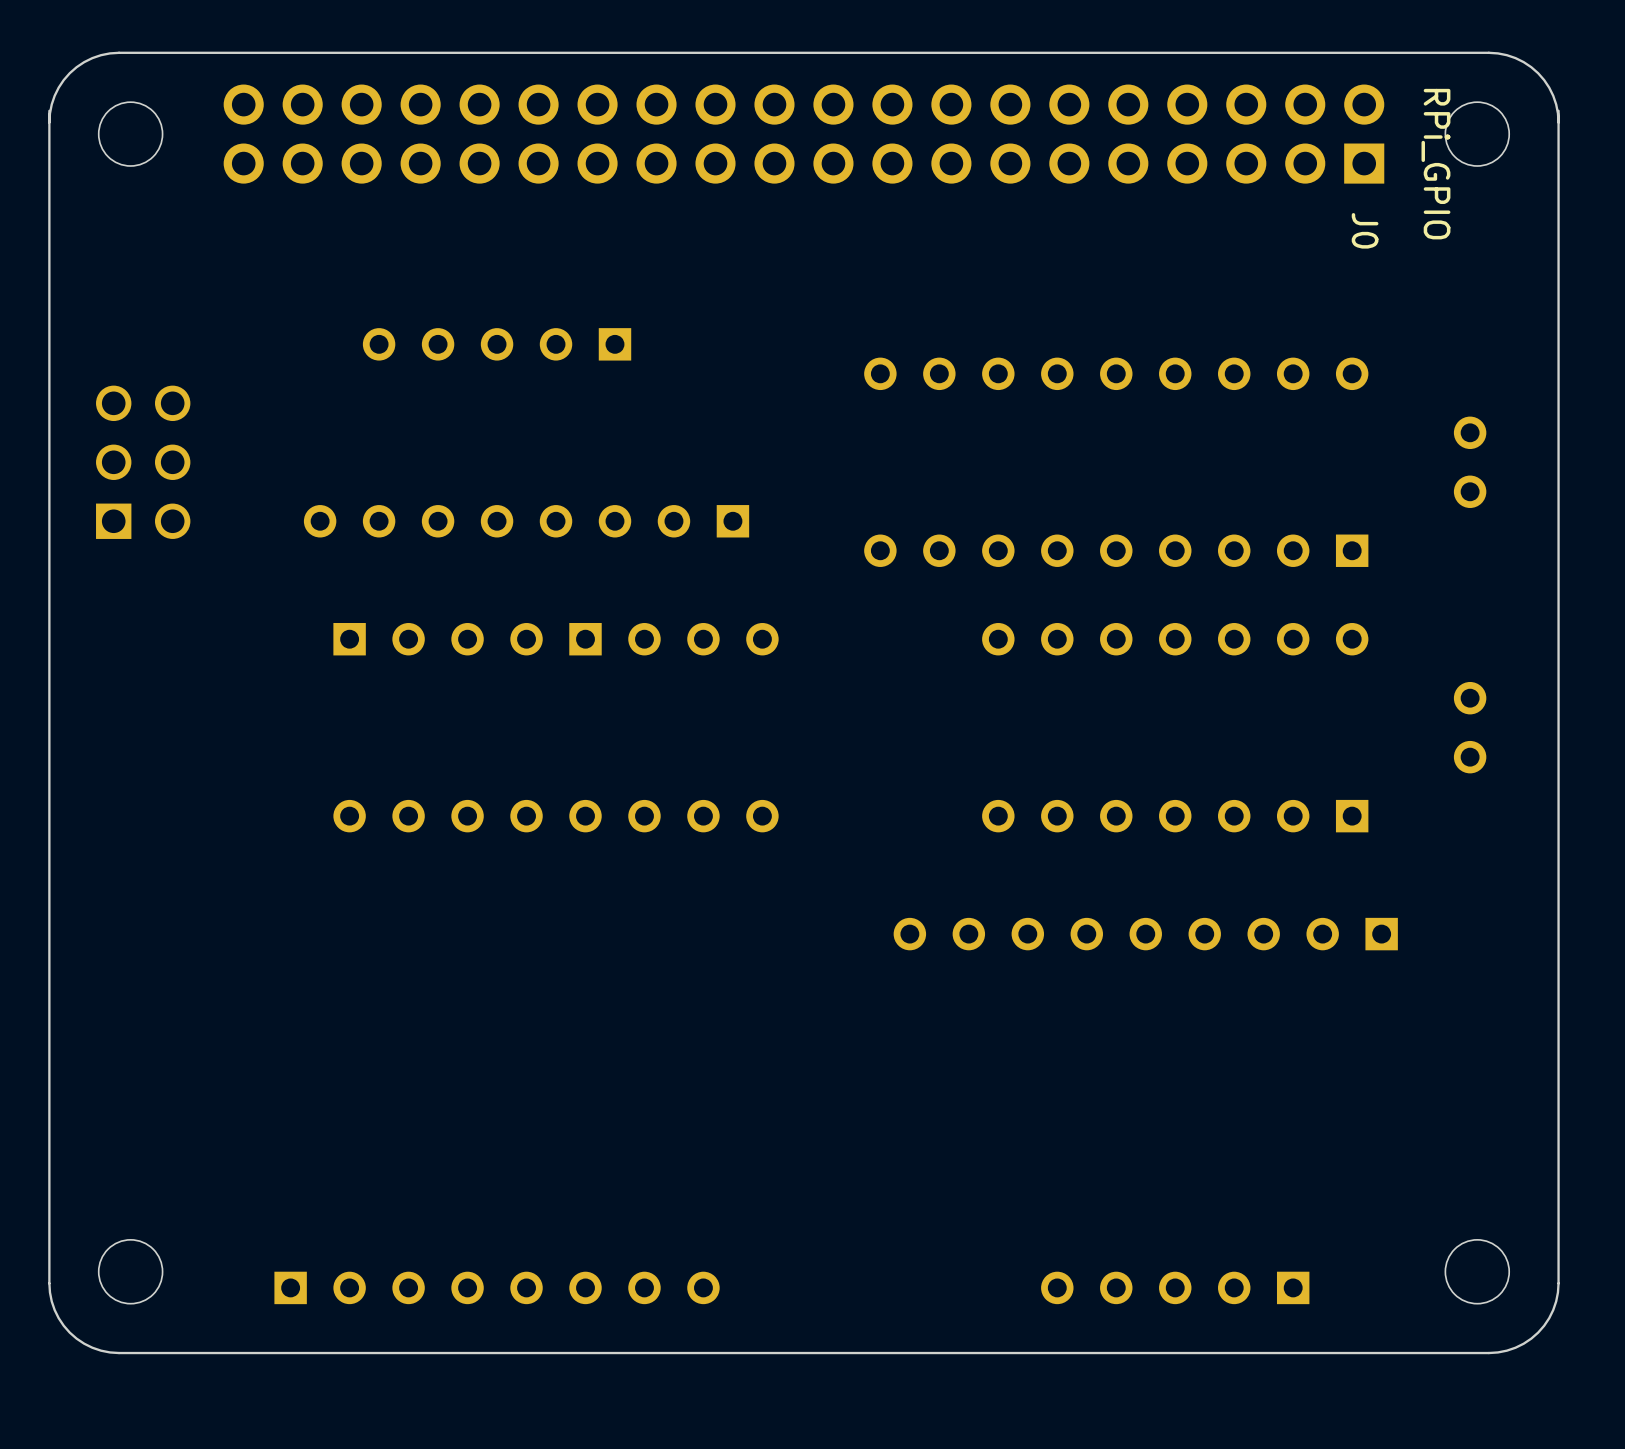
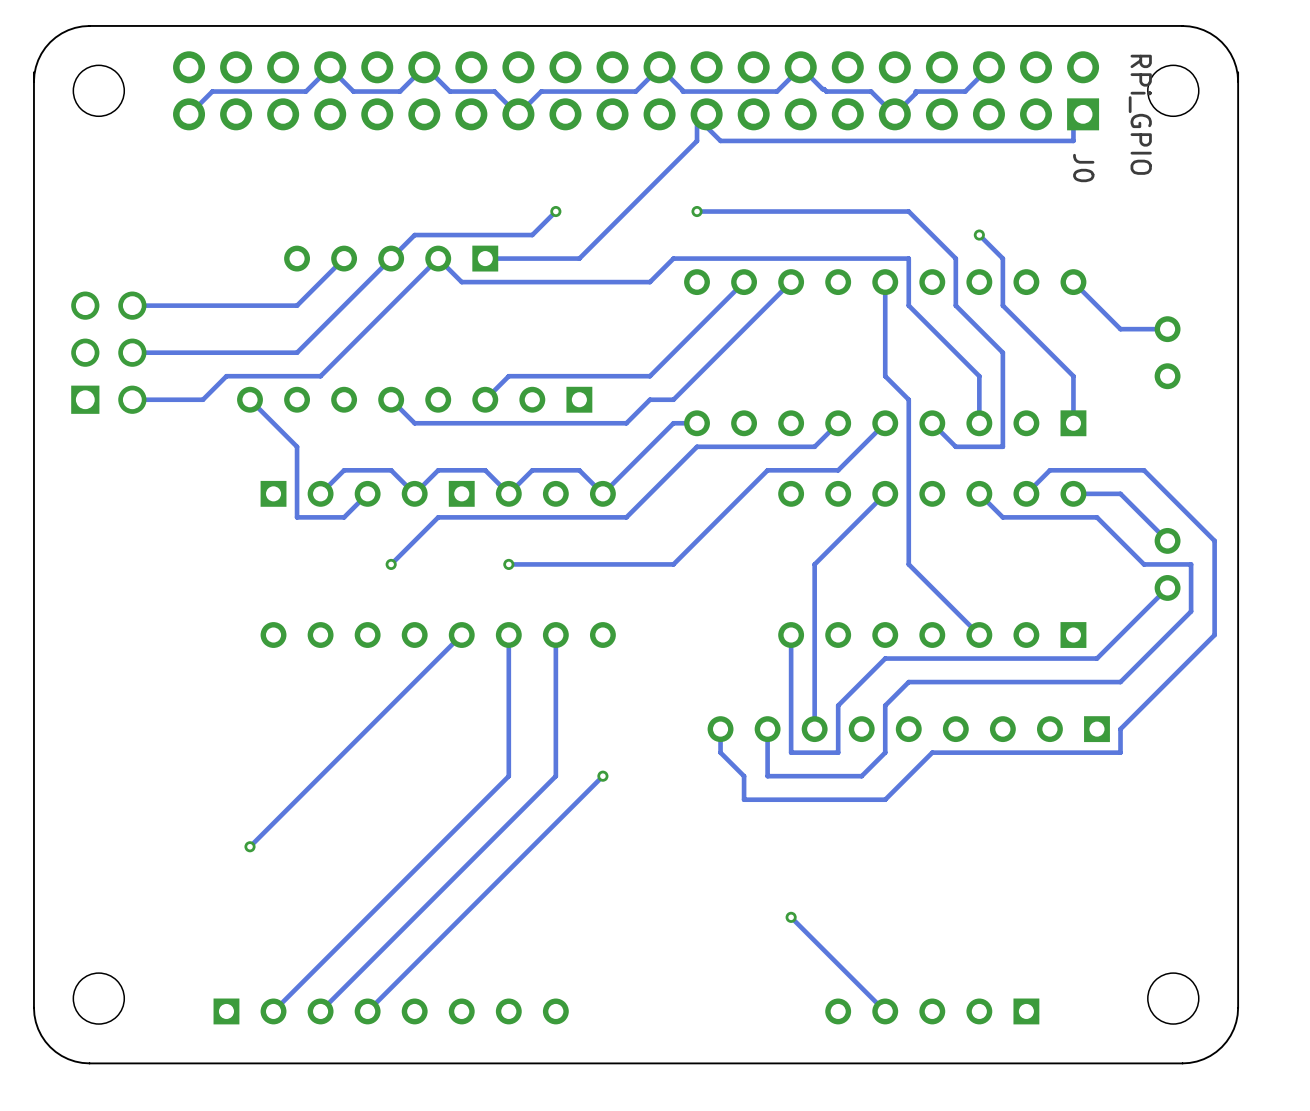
track: none -> (988, 67) (965, 91) (915, 91) (894, 114) (871, 91) (826, 91) (800, 67) (777, 91) (682, 91) (659, 67) (635, 91) (541, 91) (518, 114) (494, 91) (449, 91) (425, 67) (400, 91) (353, 91) (330, 67) (305, 91) (212, 91) (189, 114)
track: none -> (1083, 114) (1073, 117) (1073, 140) (720, 140) (697, 117)
track: none -> (697, 117) (697, 140) (579, 258) (485, 258)
track: none -> (555, 211) (532, 235) (414, 235) (297, 352) (132, 352)
via: none -> (555, 211)
track: none -> (697, 211) (908, 211) (955, 258) (955, 305) (1002, 352) (1002, 446) (955, 446) (932, 423)
via: none -> (697, 211)
track: none -> (979, 235) (1002, 258) (1002, 305) (1073, 376) (1073, 423)
via: none -> (979, 235)
track: none -> (344, 258) (297, 305) (132, 305)
track: none -> (744, 282) (649, 376) (508, 376) (485, 399)
track: none -> (791, 282) (673, 399) (649, 399) (626, 423) (414, 423) (391, 399)
track: none -> (885, 282) (885, 376) (908, 399) (908, 564) (979, 635)
track: none -> (1073, 282) (1120, 329) (1167, 329)
track: none -> (132, 399) (202, 399) (226, 376) (320, 376) (438, 258) (461, 282) (649, 282) (673, 258) (908, 258) (908, 305) (979, 376) (979, 423)
track: none -> (250, 399) (297, 446) (297, 517) (344, 517) (367, 493)
track: none -> (697, 423) (673, 423) (602, 493) (579, 470) (532, 470) (508, 493) (485, 470) (438, 470) (414, 493) (391, 470) (344, 470) (320, 493)
track: none -> (838, 423) (814, 446) (697, 446) (626, 517) (438, 517) (391, 564)
track: none -> (885, 423) (838, 470) (767, 470) (673, 564) (508, 564)
track: none -> (885, 493) (814, 564) (814, 729)
track: none -> (979, 493) (1002, 517) (1096, 517) (1144, 564) (1191, 564) (1191, 611) (1120, 682) (908, 682) (885, 705) (885, 752) (861, 776) (767, 776) (767, 729)
track: none -> (1026, 493) (1049, 470) (1144, 470) (1214, 540) (1214, 635) (1120, 729) (1120, 752) (932, 752) (885, 799) (744, 799) (744, 776) (720, 752) (720, 729)
track: none -> (1073, 493) (1120, 493) (1167, 540)
via: none -> (391, 564)
via: none -> (508, 564)
track: none -> (1167, 587) (1096, 658) (885, 658) (838, 705) (838, 752) (791, 752) (791, 635)
track: none -> (461, 635) (250, 846)
track: none -> (508, 635) (508, 776) (273, 1011)
track: none -> (555, 635) (555, 776) (320, 1011)
track: none -> (602, 776) (367, 1011)
via: none -> (602, 776)
via: none -> (250, 846)
track: none -> (791, 917) (885, 1011)
via: none -> (791, 917)

